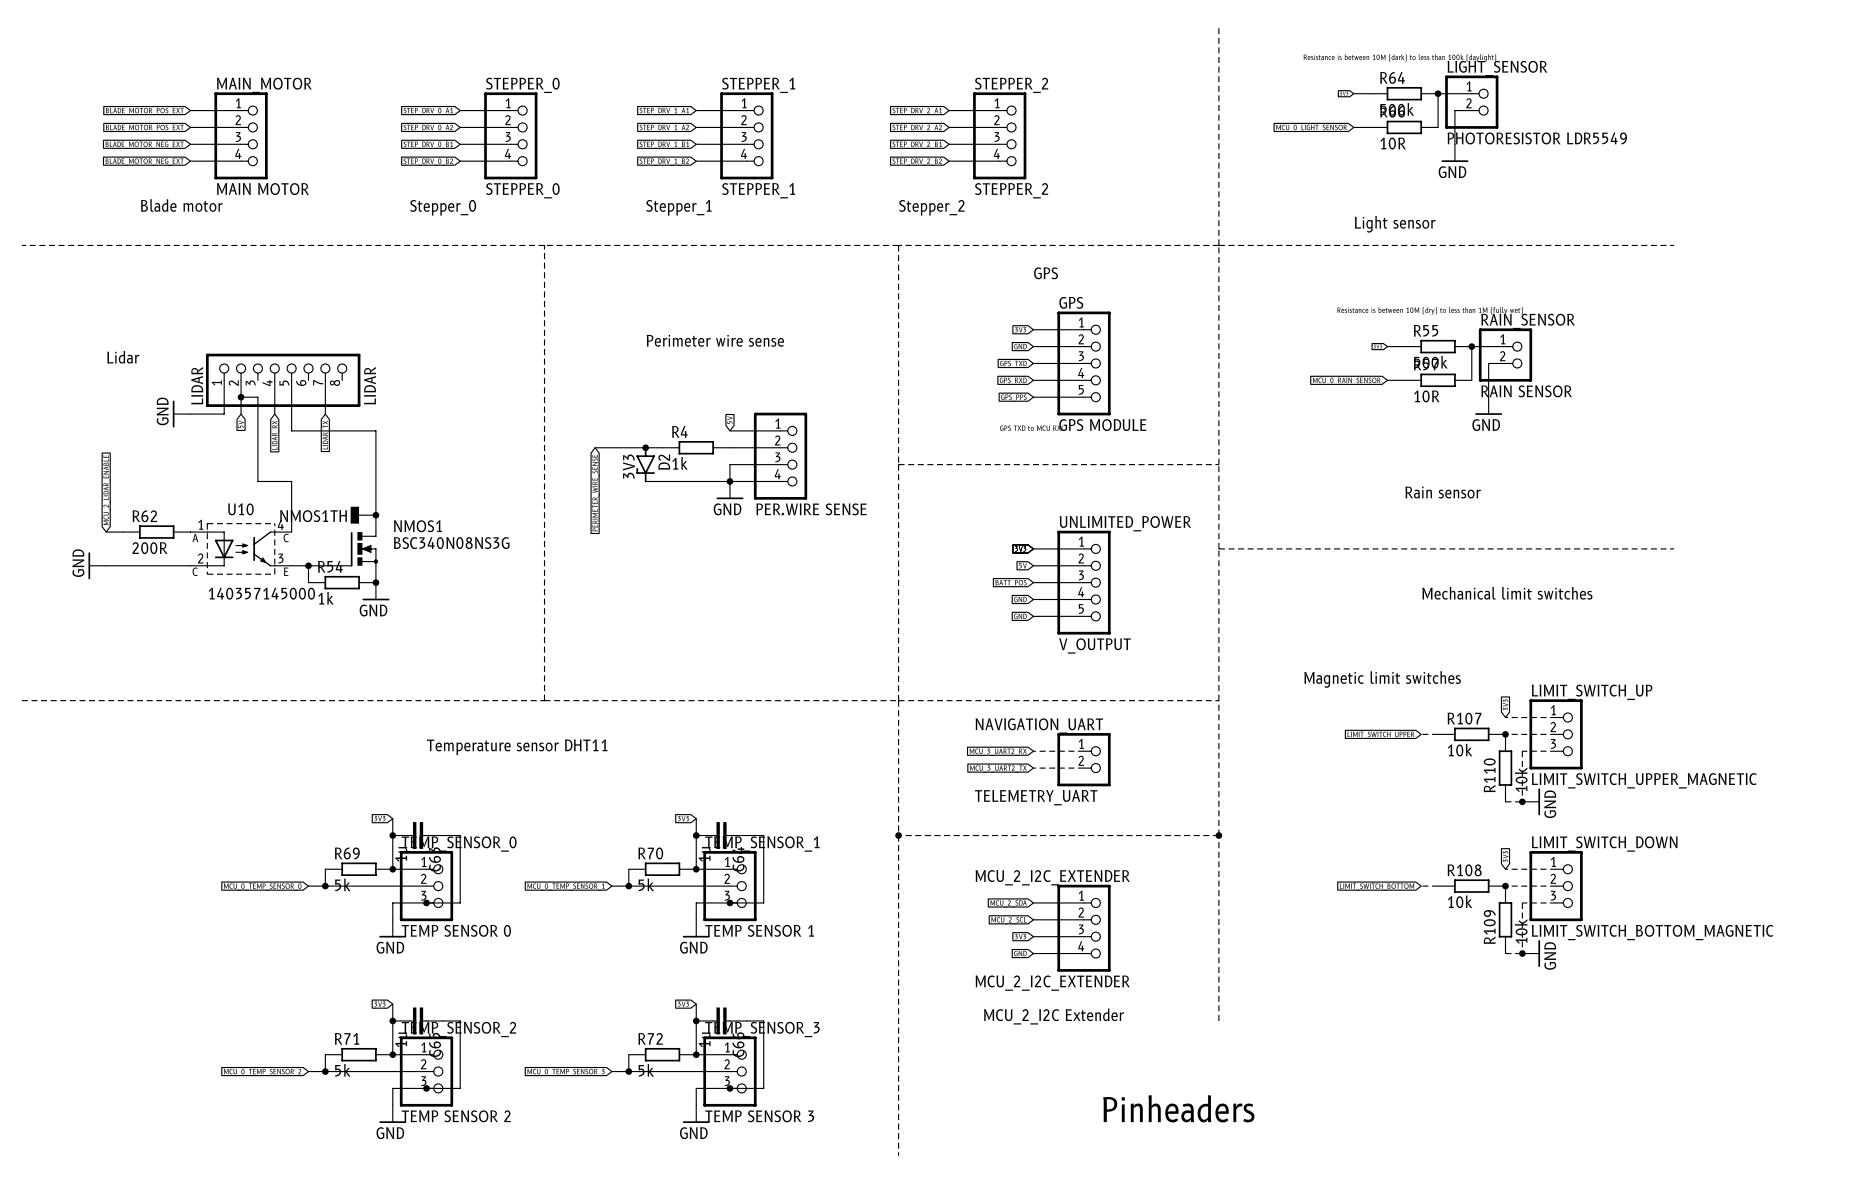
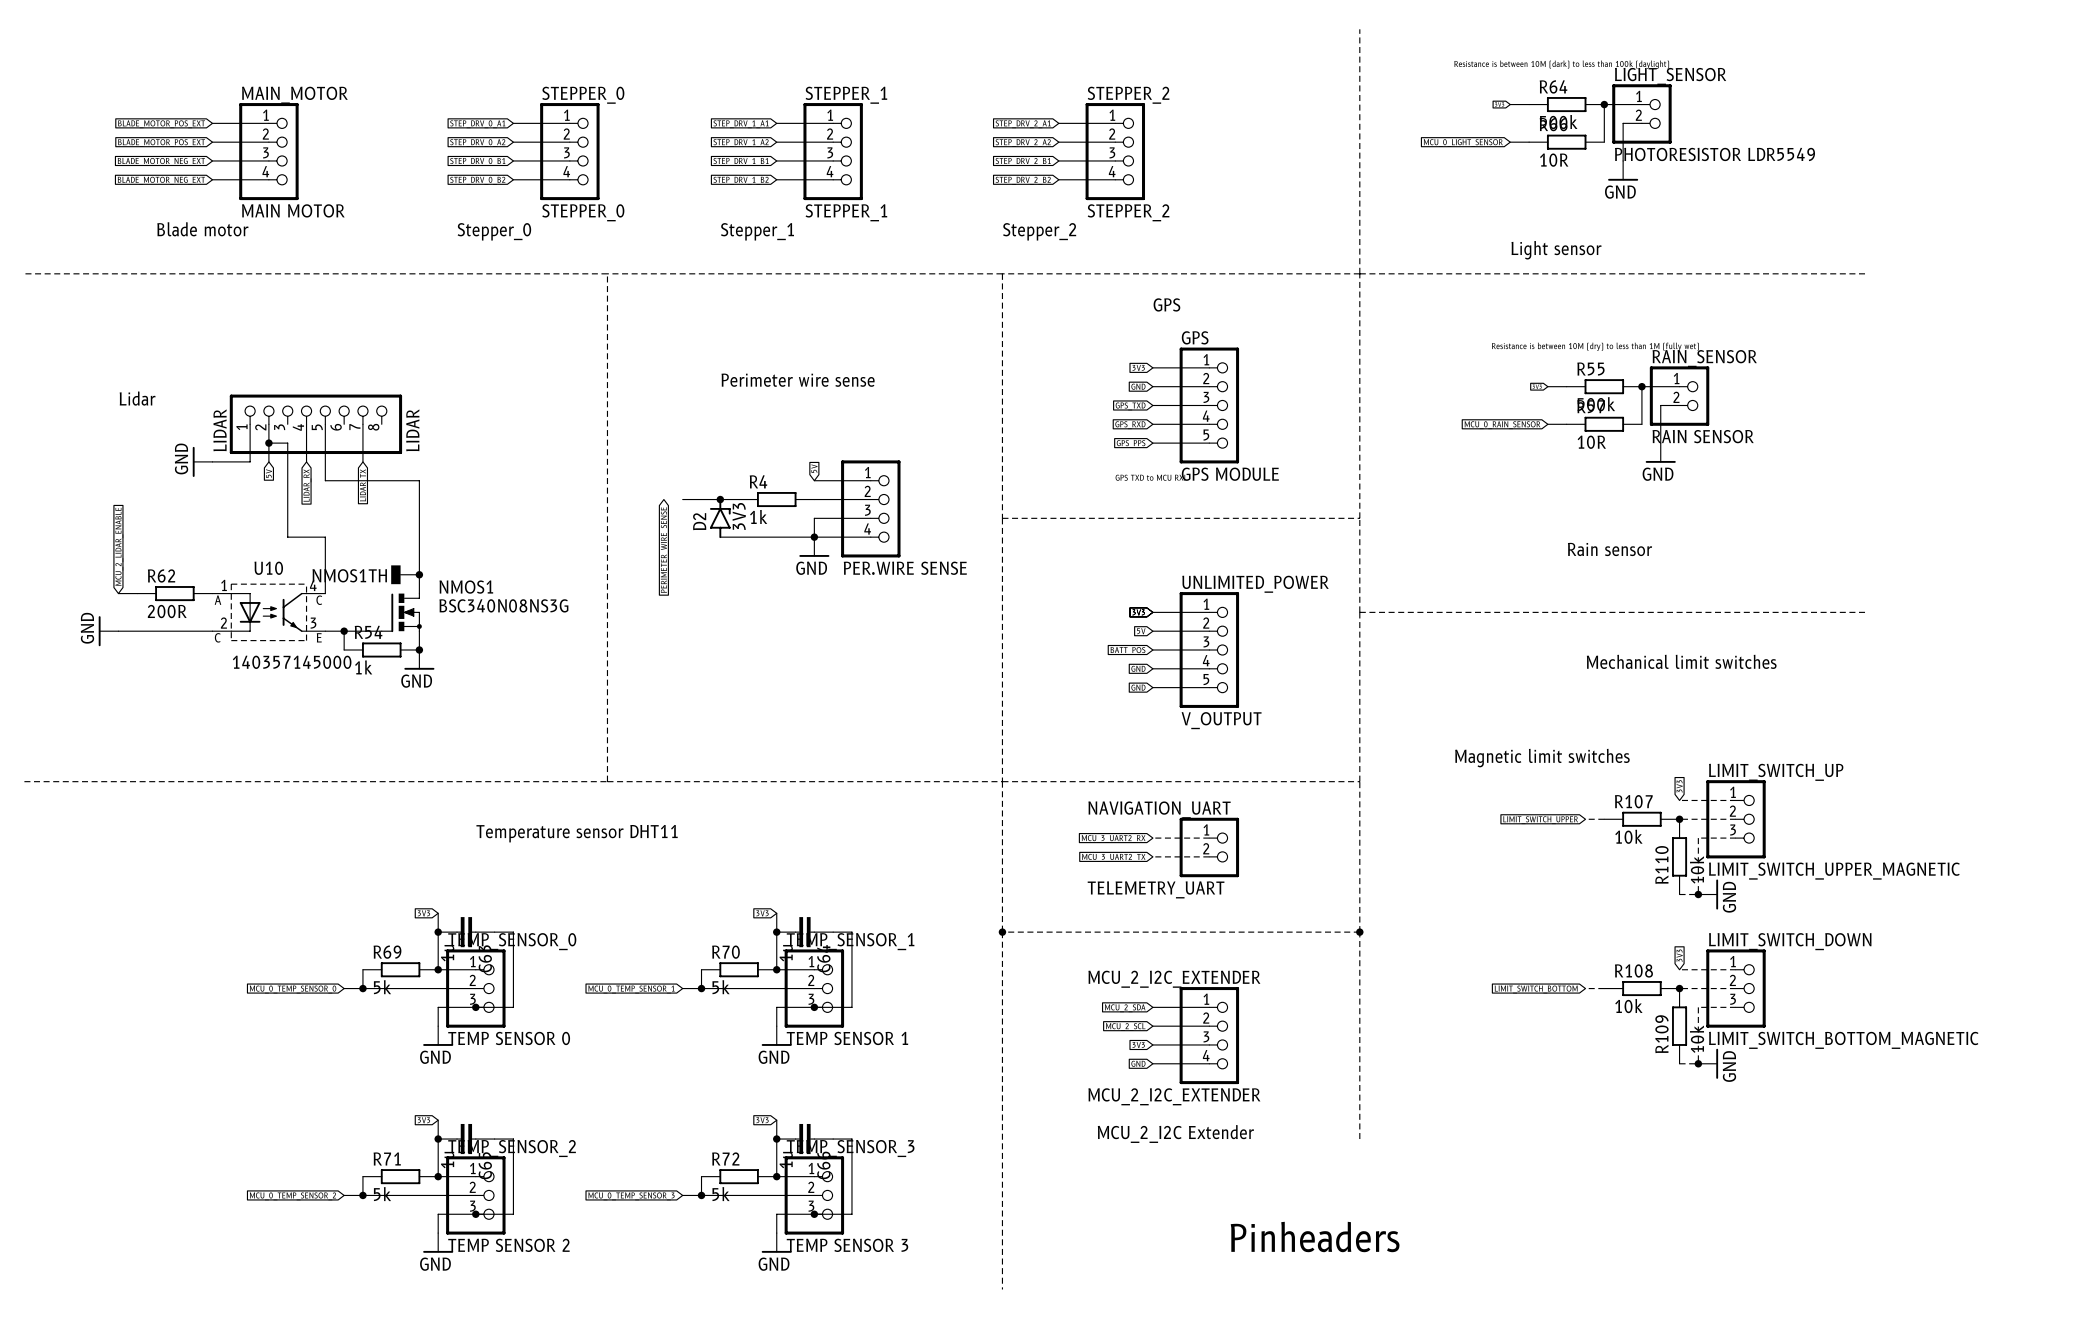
wire: (595, 447) (611, 447) -> none
D2 rotation: 0° (645, 464) -> 180° (720, 518)

